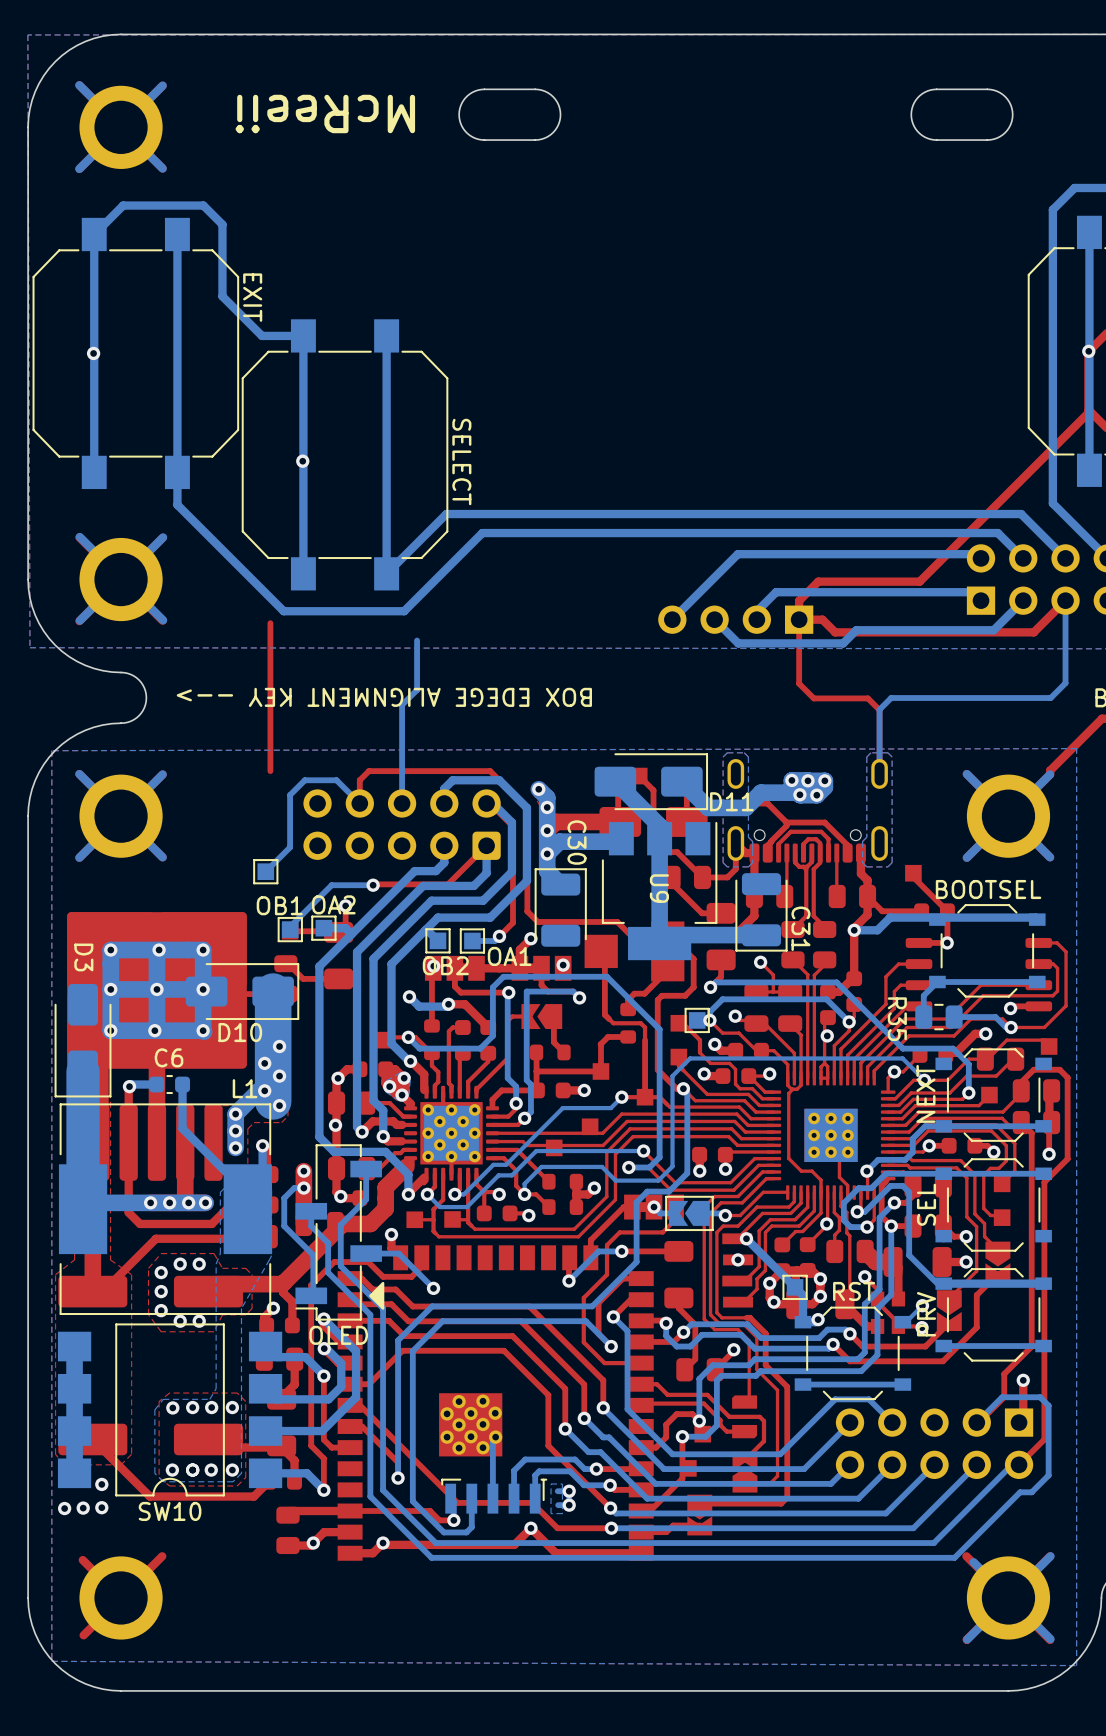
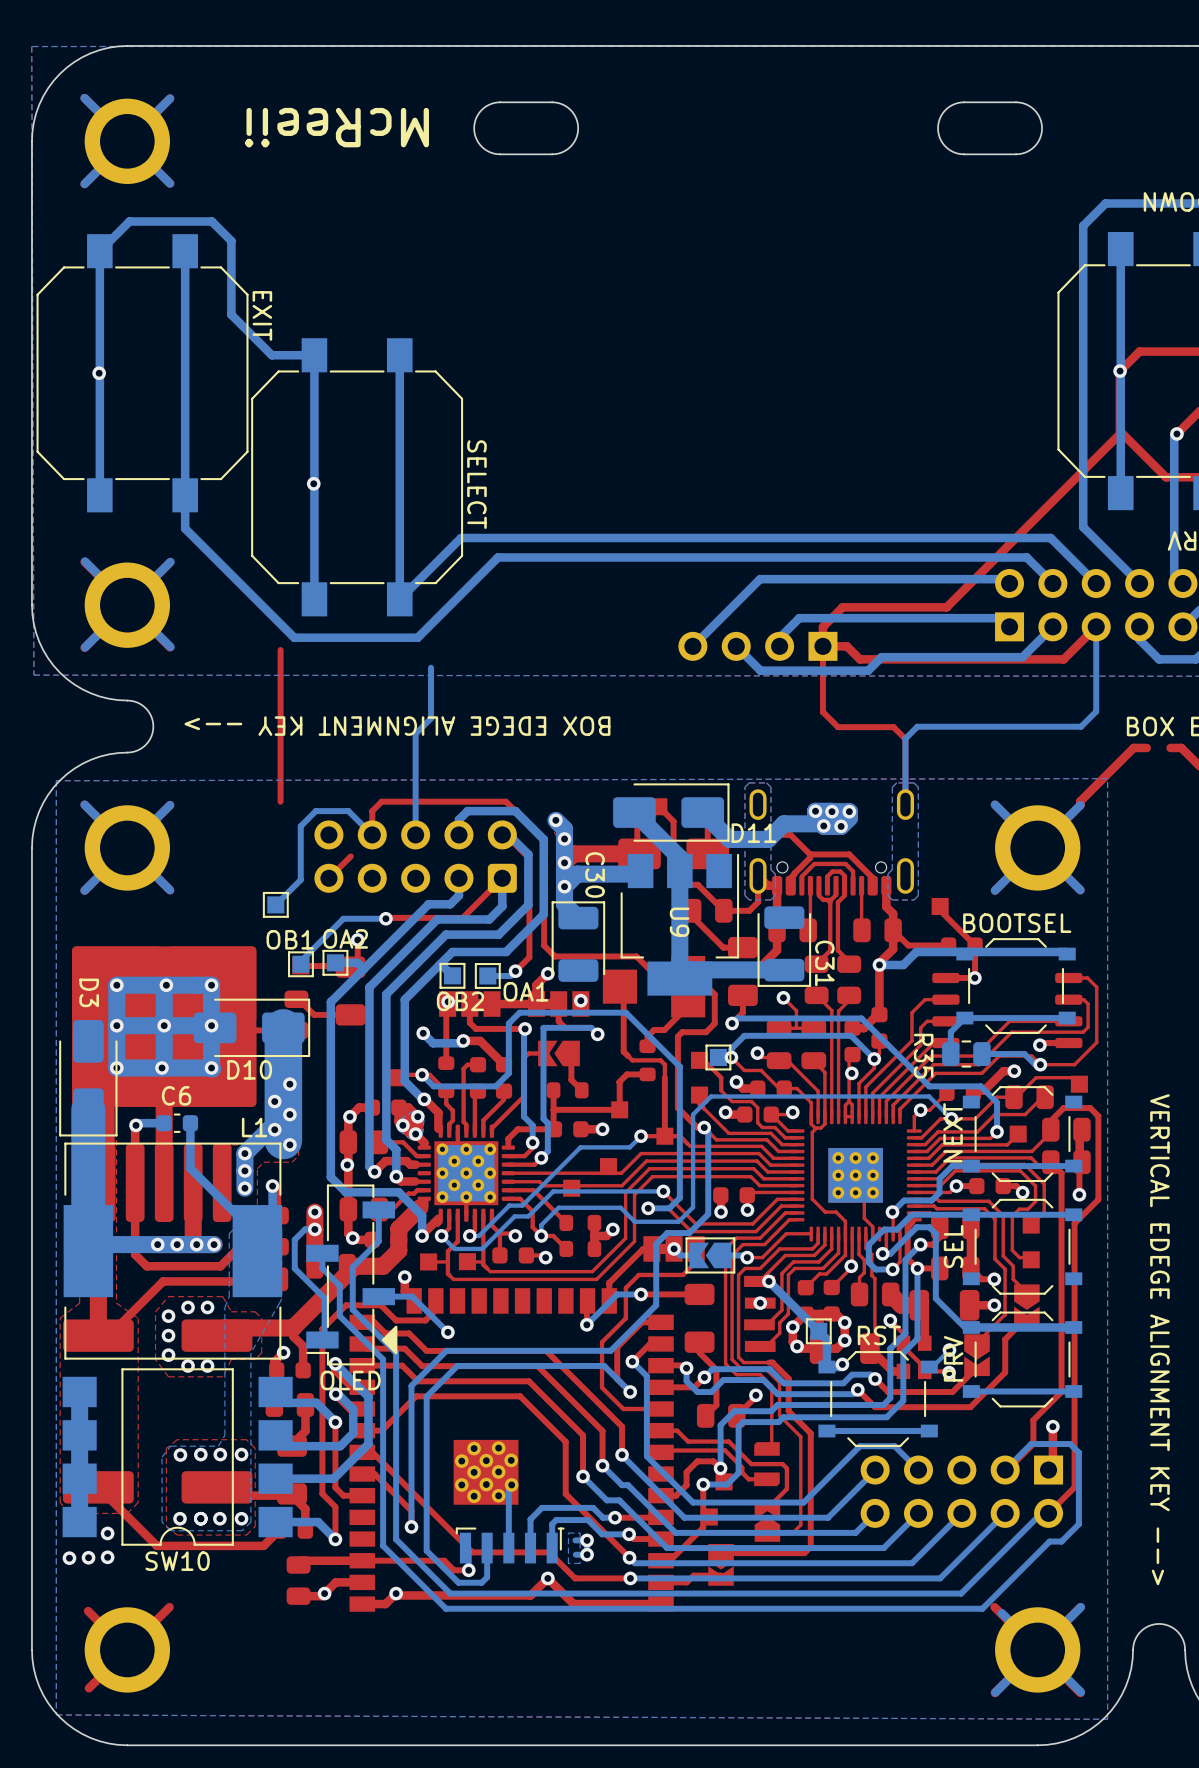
top track: none -> (350, 856) (328, 878)

